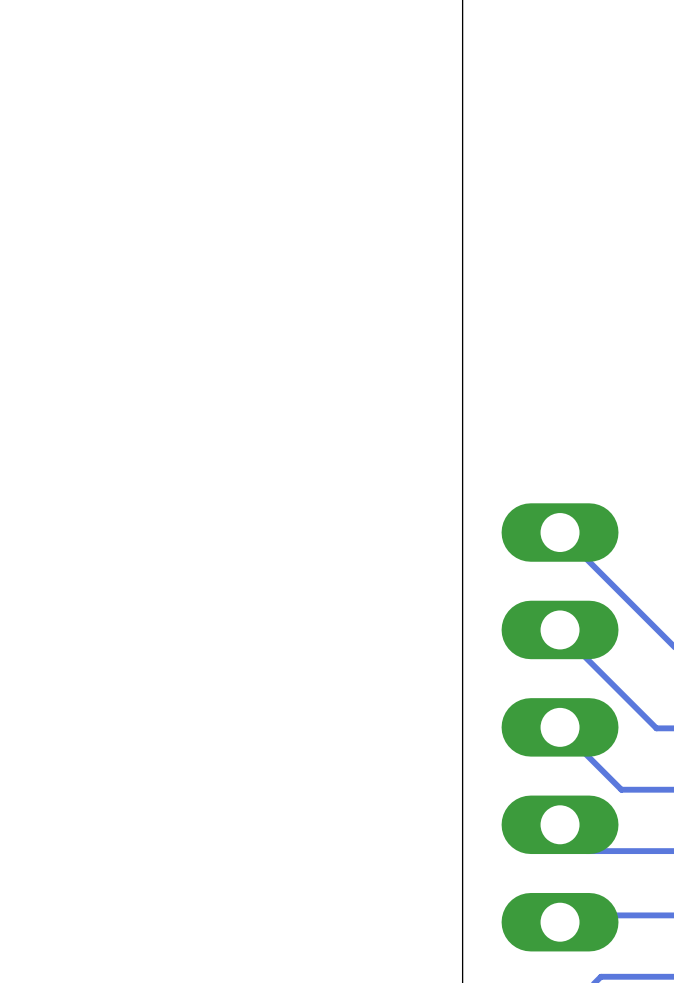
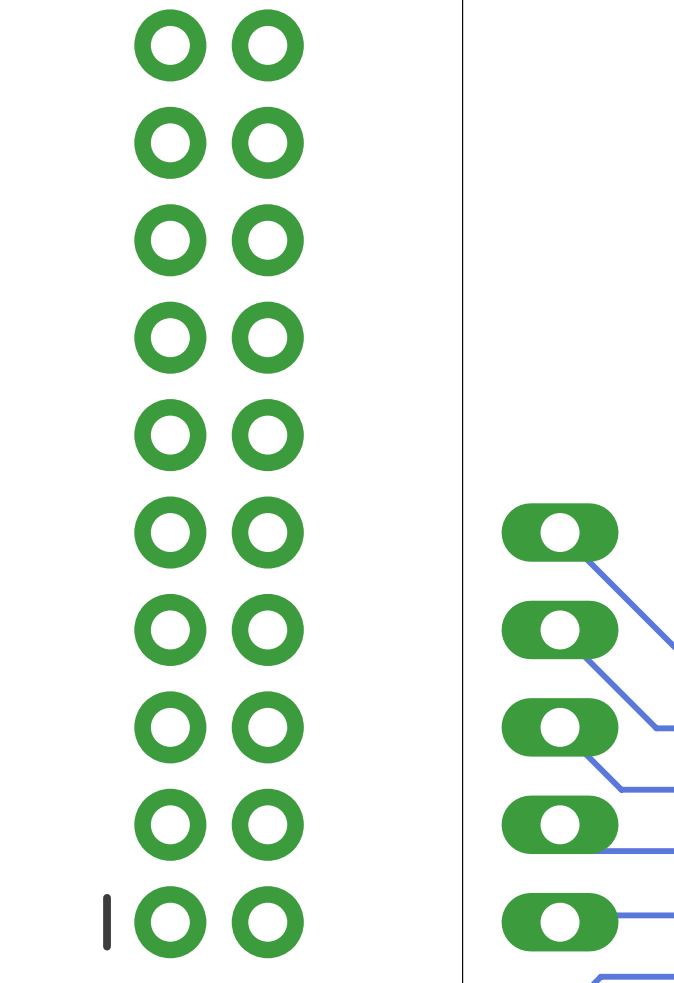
part: none -> (203, 483)

